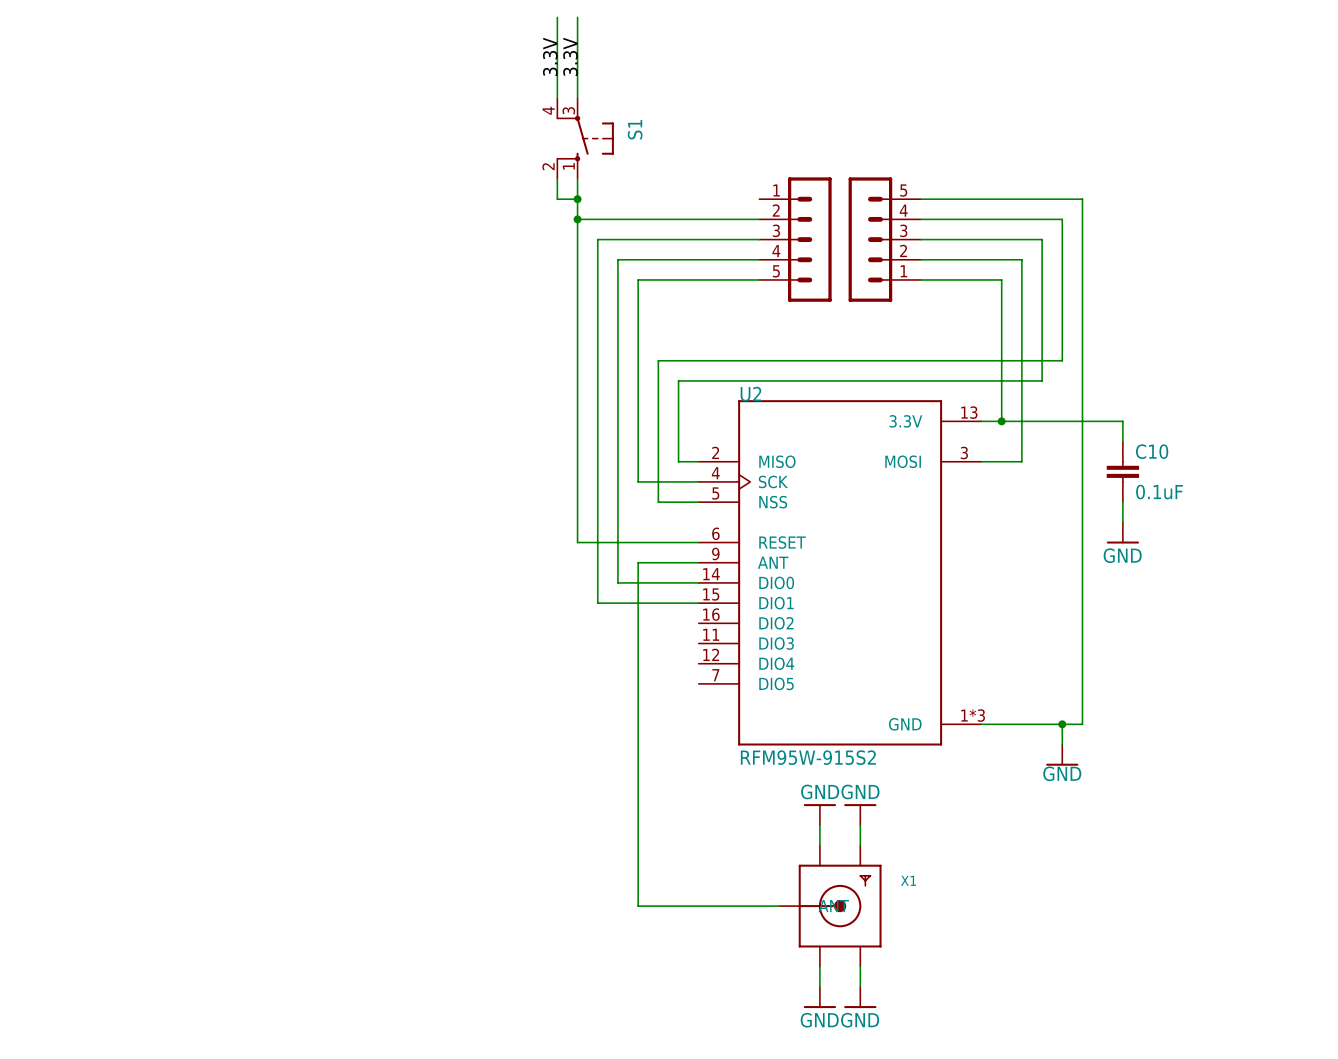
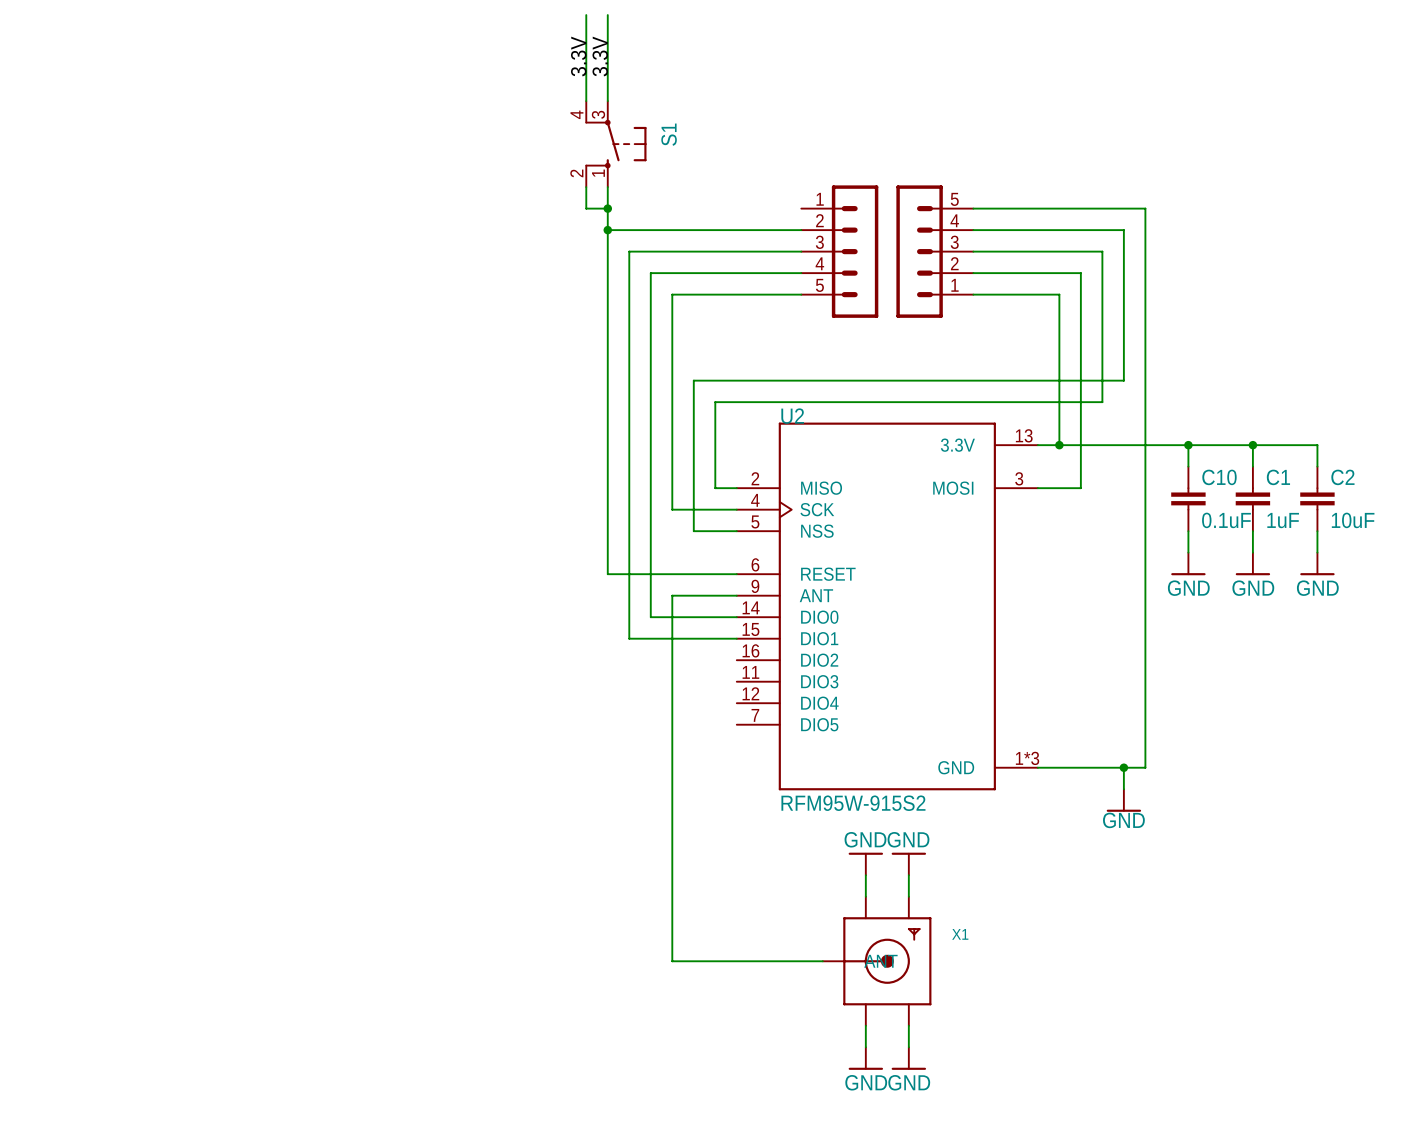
wire: none -> (1188, 445) (1317, 445) (1317, 466)
junction: none -> (1188, 445)
wire: none -> (1252, 445) (1252, 466)
junction: none -> (1252, 445)
C1: none -> 1uF (1252, 498)
C2: none -> 10uF (1317, 498)
wire: none -> (1252, 531) (1252, 552)
wire: none -> (1317, 531) (1317, 552)
power symbol: none -> GND (1252, 563)
power symbol: none -> GND (1317, 563)

